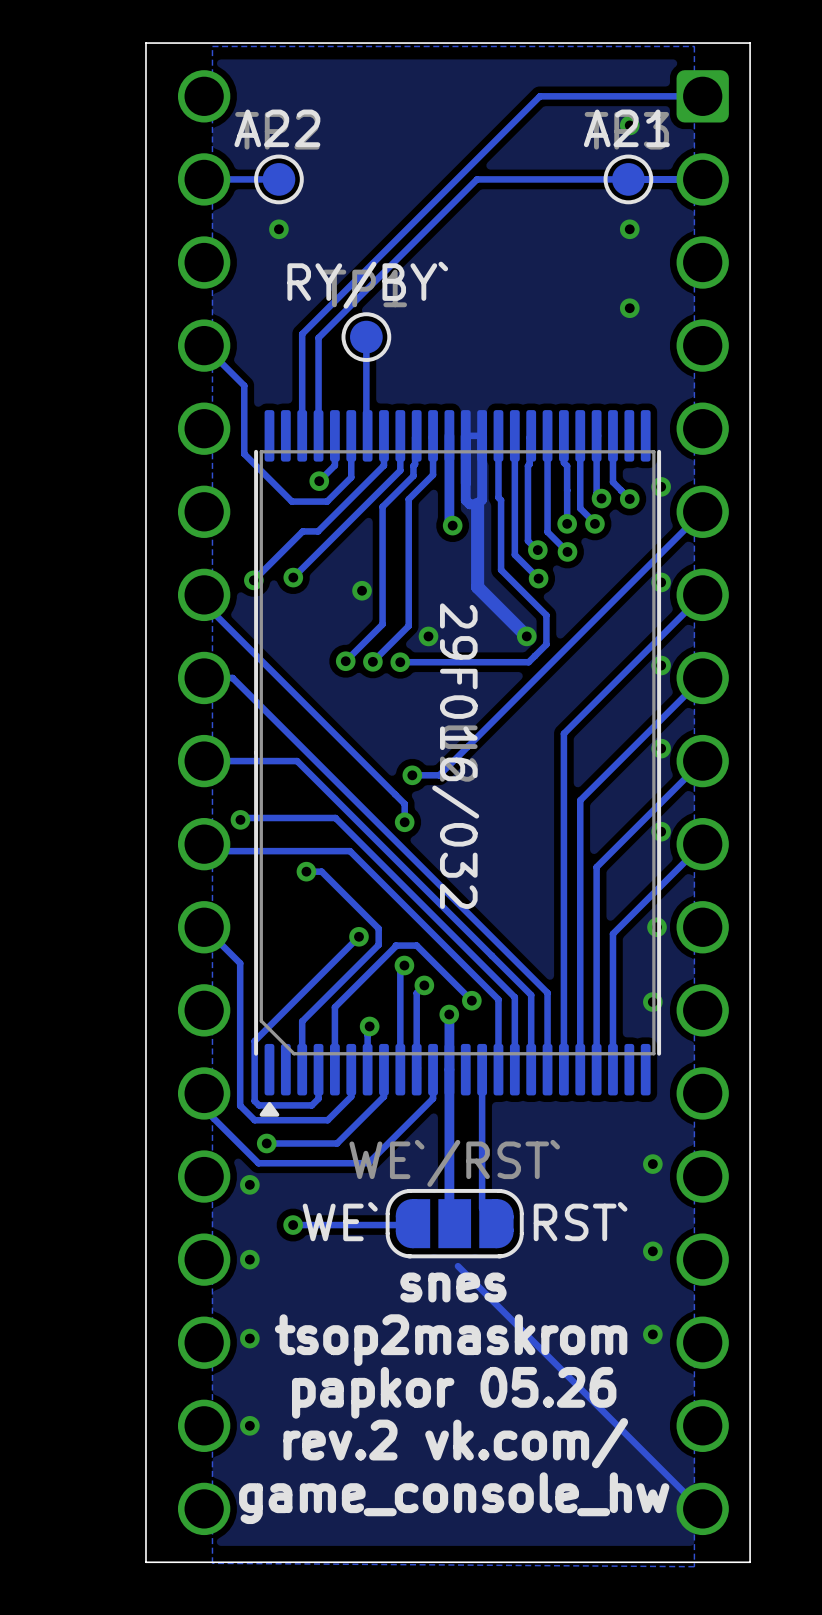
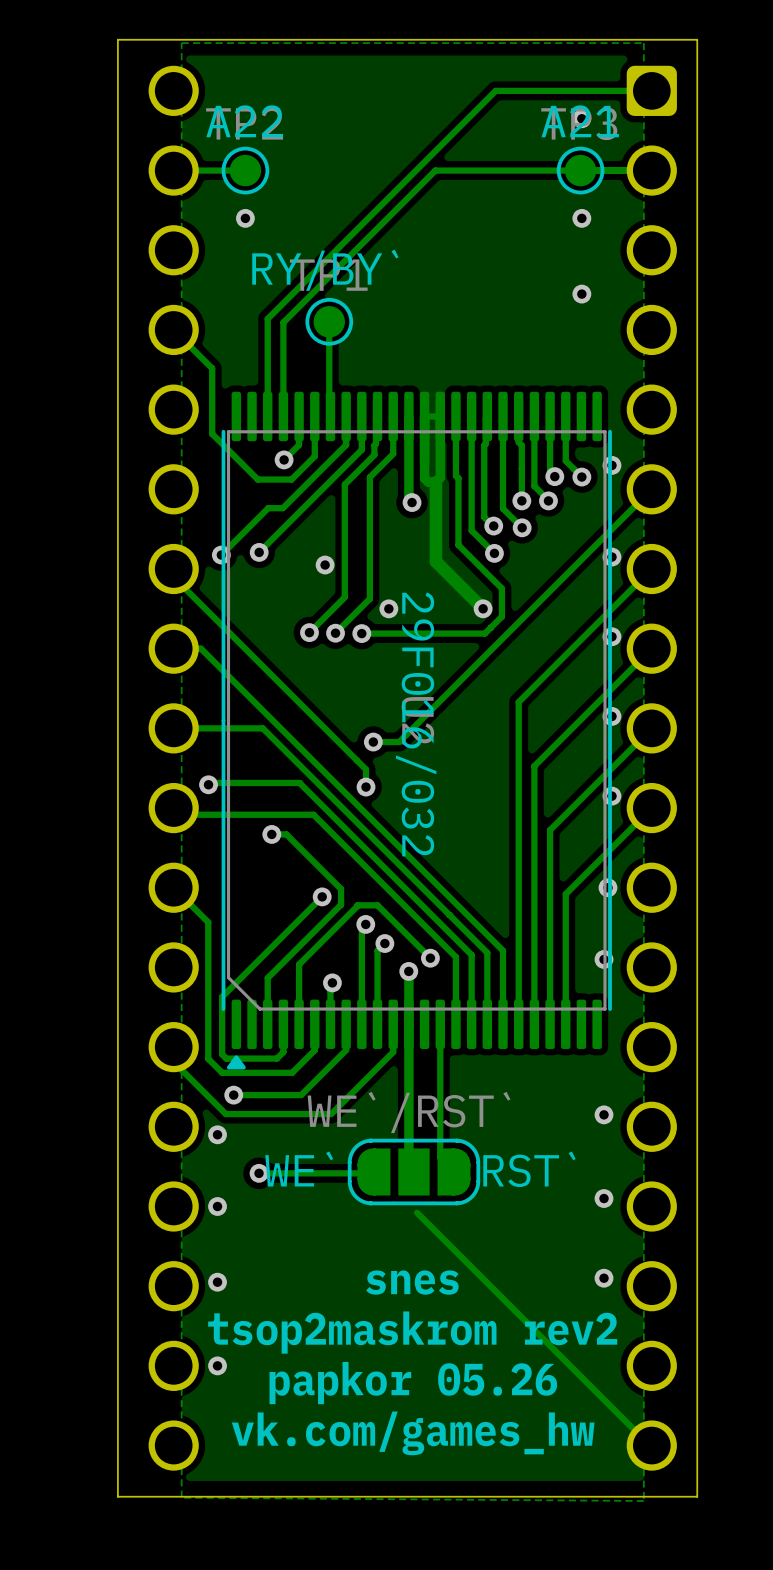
text: snes (453, 1287) -> none
text: tsop2maskrom (451, 1340) -> snes (412, 1282)
text: papkor 05.26 (454, 1392) -> tsop2maskrom rev2 (412, 1332)
text: rev.2 vk.com/ (455, 1443) -> papkor 05.26 (413, 1383)
text: game_console_hw (454, 1498) -> vk.com/games_hw (413, 1433)

